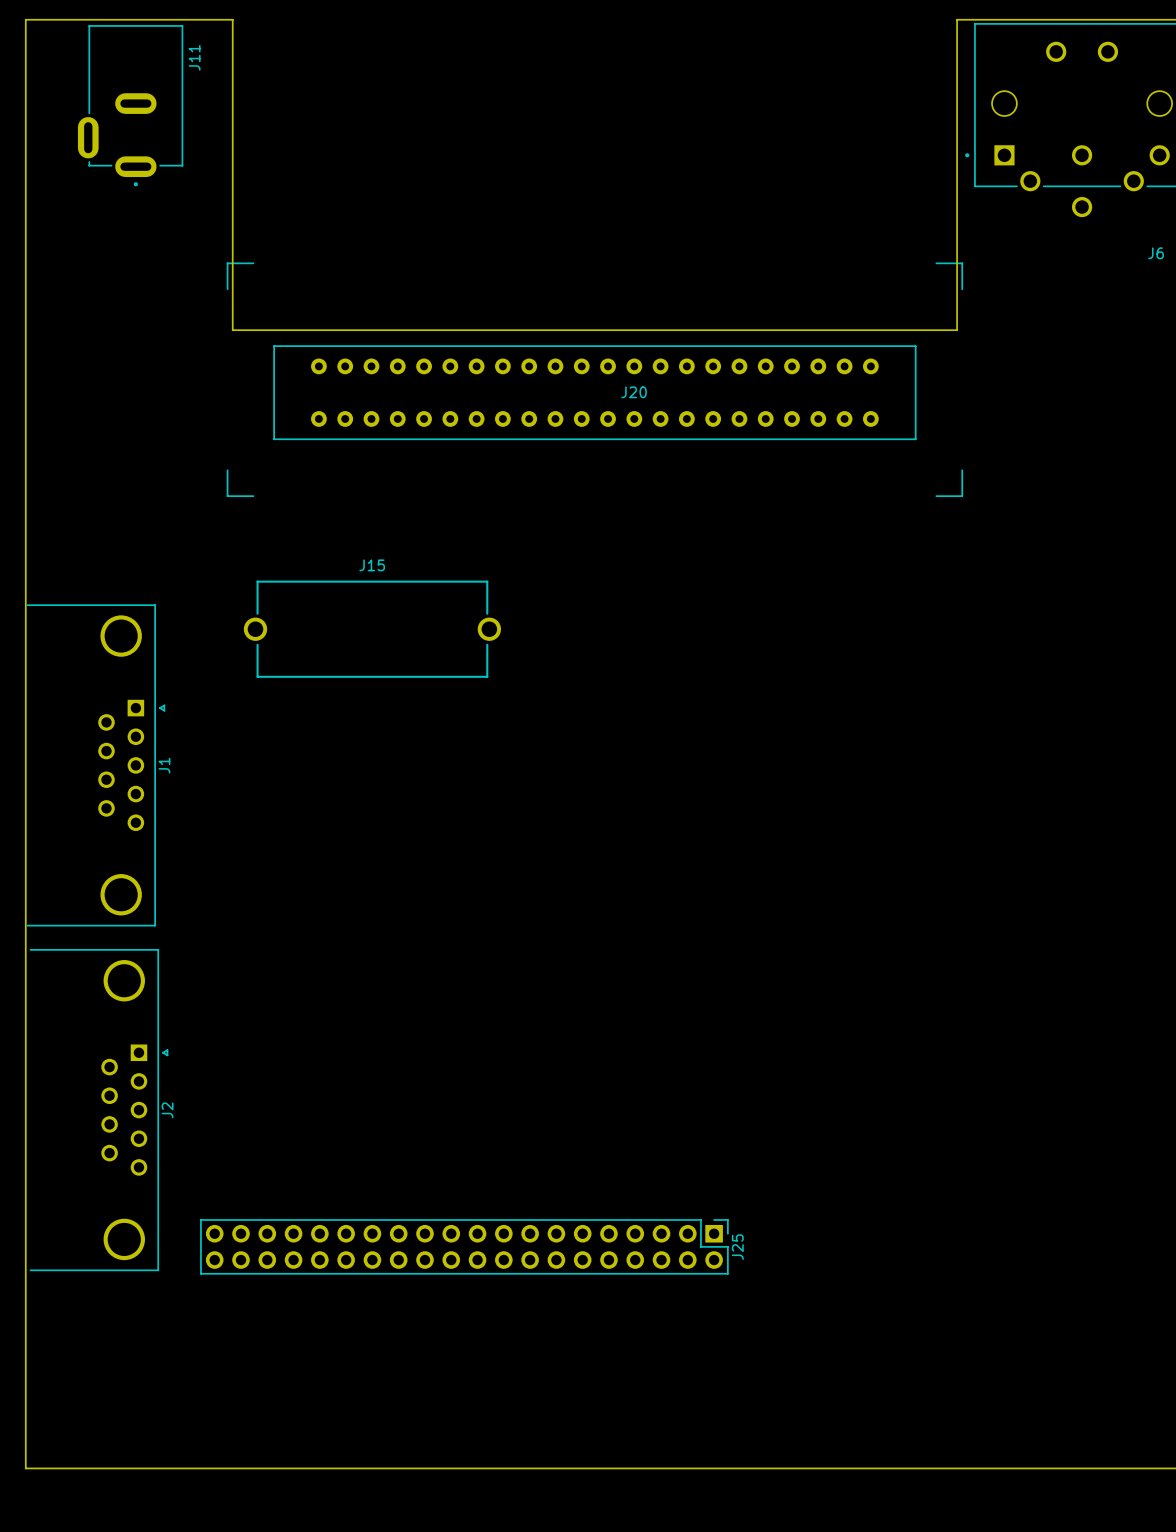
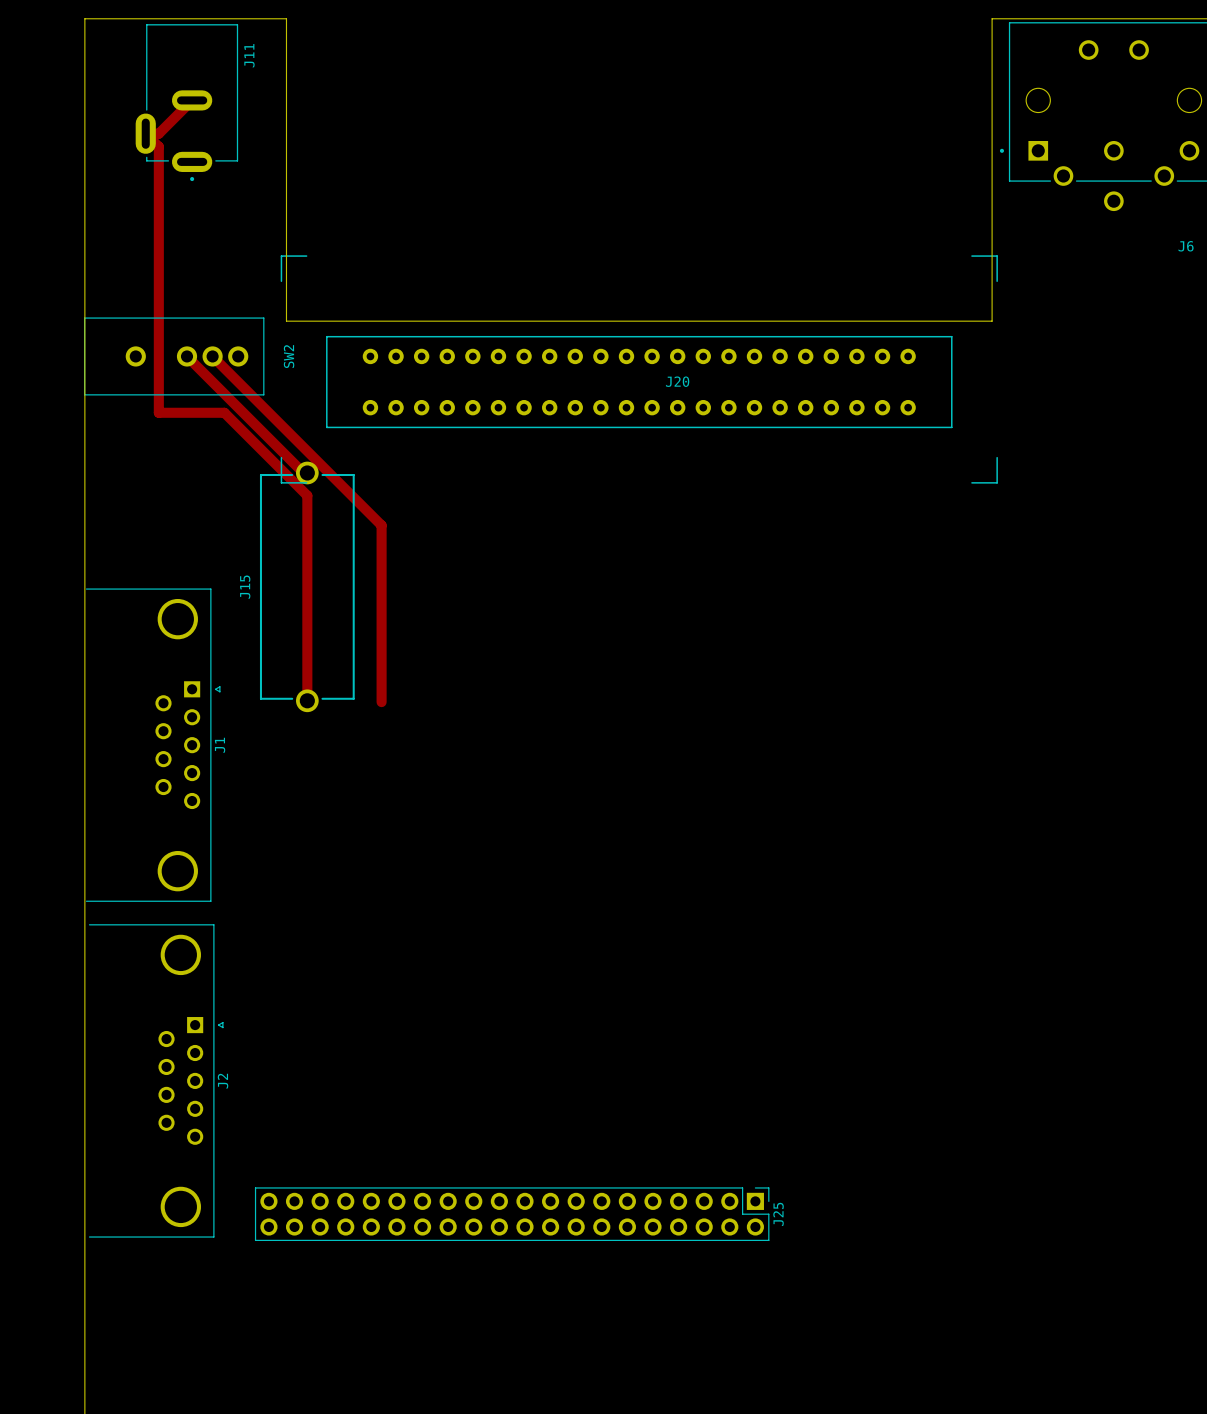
top track: none -> (192, 100) (158, 133) (145, 133) (158, 146) (158, 412) (224, 412) (307, 495) (307, 700)
SW2: none -> (174, 356)
top track: none -> (187, 356) (303, 472)
top track: none -> (212, 356) (381, 525) (381, 702)
J15 name position: J15 (372, 565) -> J15 (245, 587)
J15 rotation: 0° (372, 629) -> 90° clockwise (307, 586)

